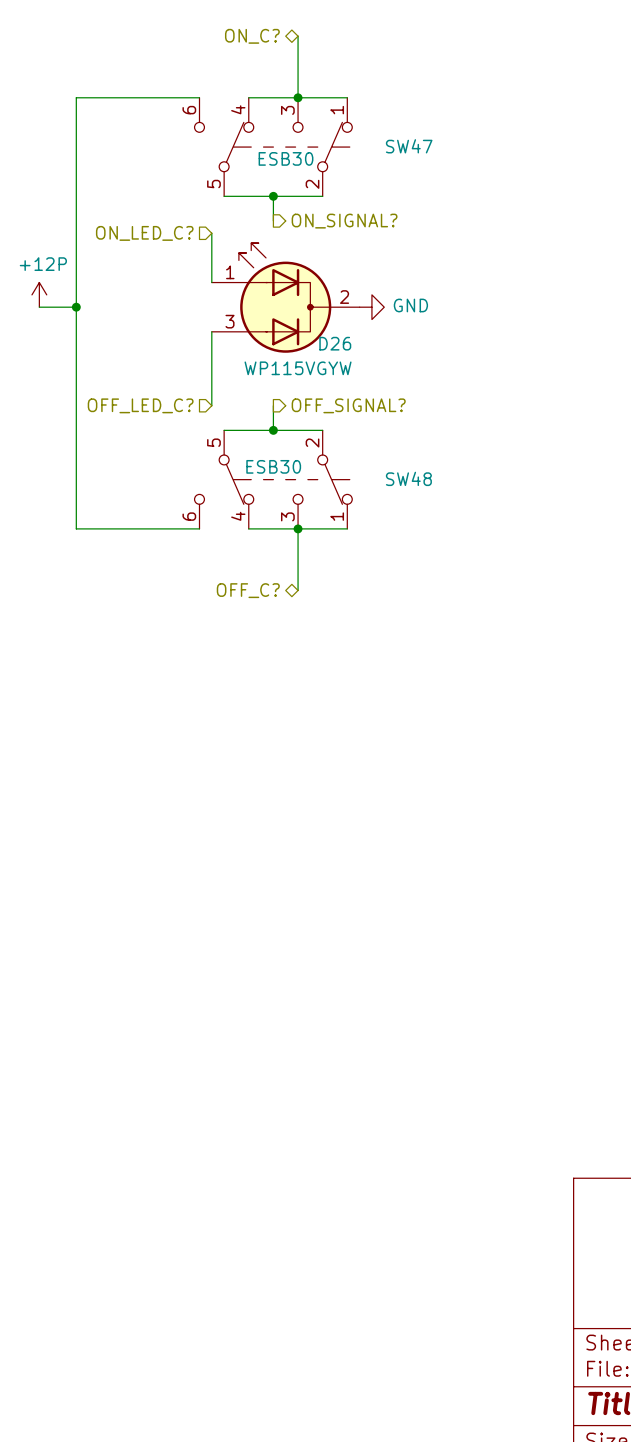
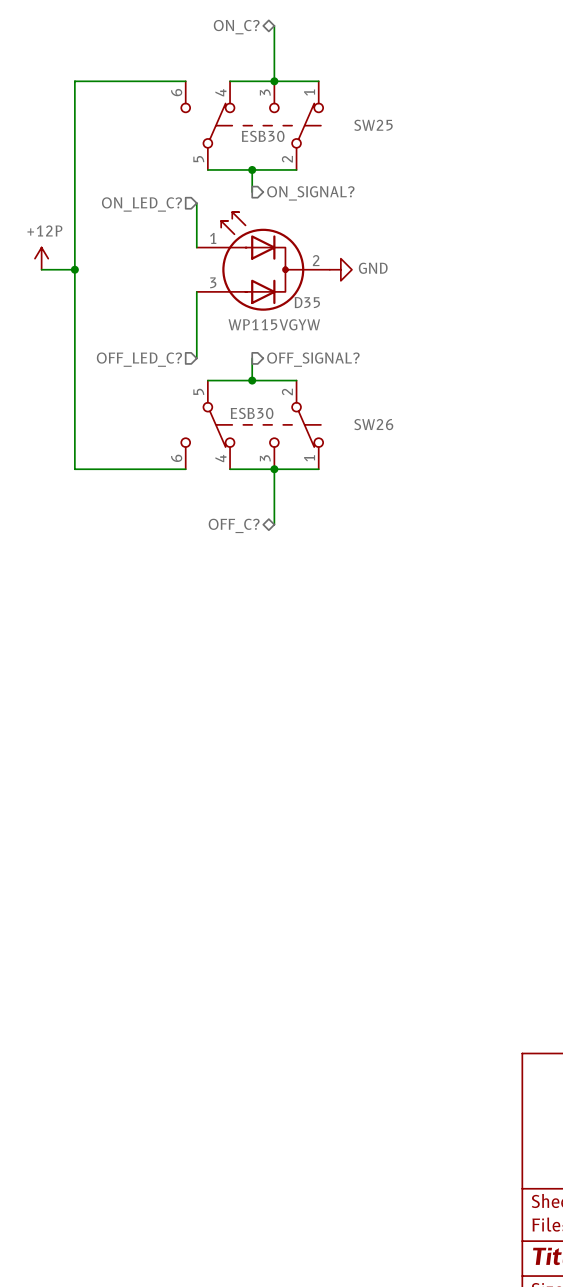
SW47 name: SW47 (409, 146) -> SW25 (373, 125)
D26 name: D26 (335, 343) -> D35 (307, 302)
SW48 name: SW48 (408, 478) -> SW26 (373, 424)

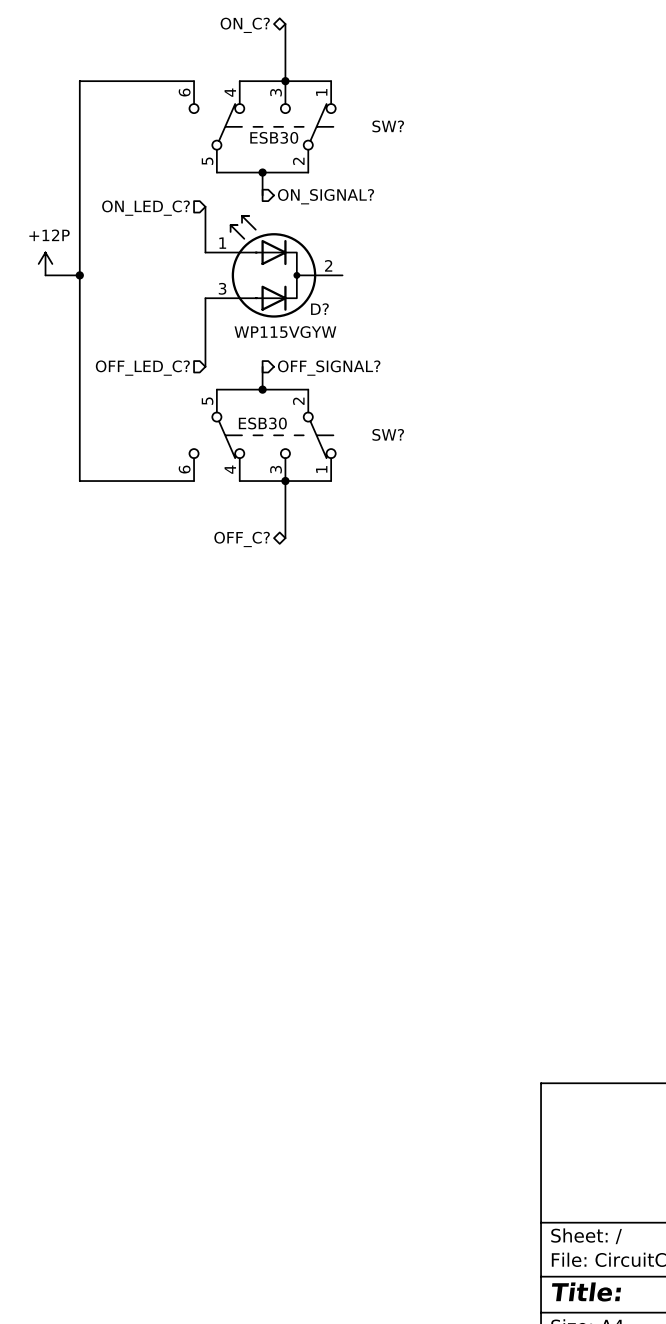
SW25 name: SW25 (373, 125) -> SW? (388, 126)
power symbol: GND (340, 269) -> none
D35 name: D35 (307, 302) -> D? (319, 309)
SW26 name: SW26 (373, 424) -> SW? (388, 434)

